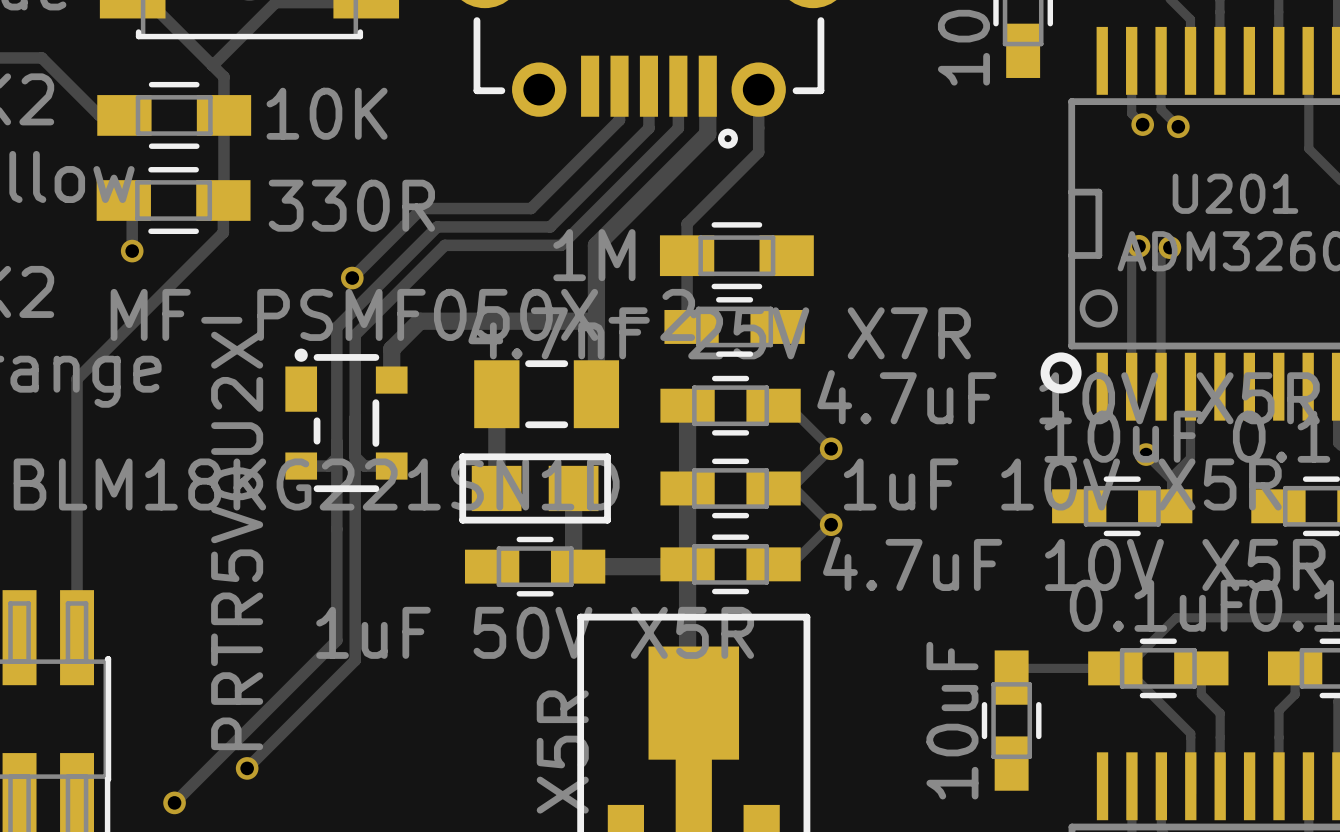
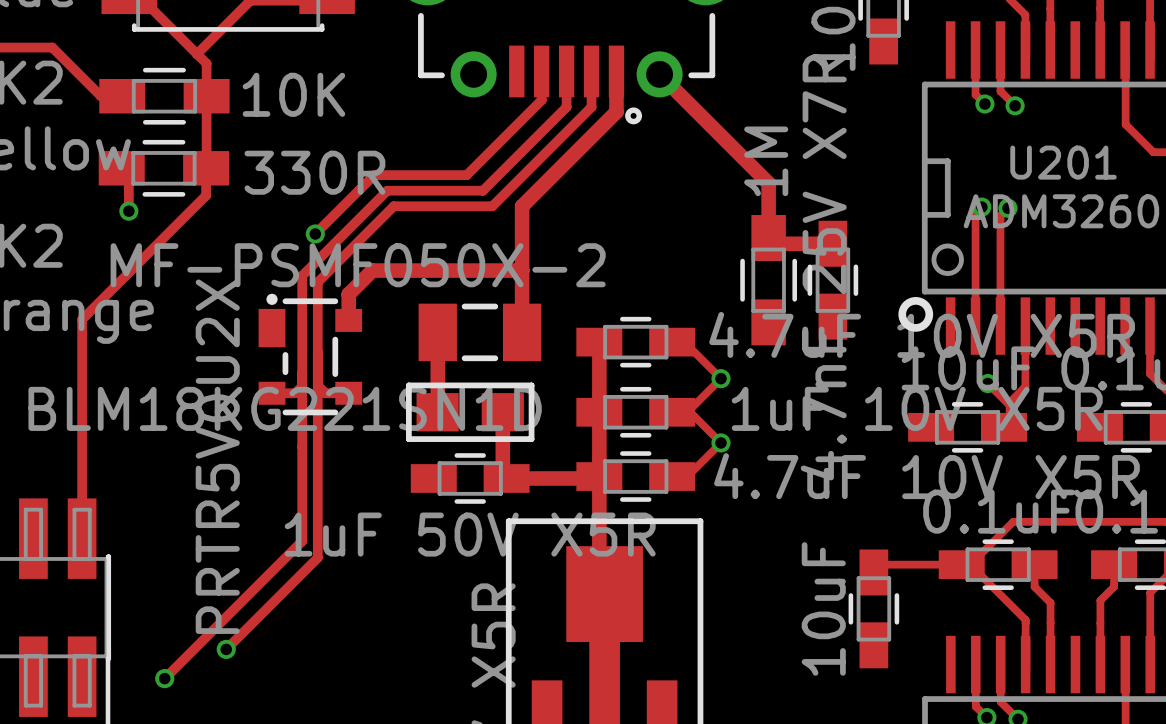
track: (758, 89) (758, 152) (687, 223) (687, 322) (691, 326) -> (659, 74) (768, 183) (768, 238) (774, 243) (832, 243)
part rotation: 0° (736, 255) -> 90° clockwise (768, 280)
part position: (736, 255) -> (768, 280)
part rotation: 0° (734, 326) -> 90° clockwise (832, 280)
part position: (734, 326) -> (832, 280)

